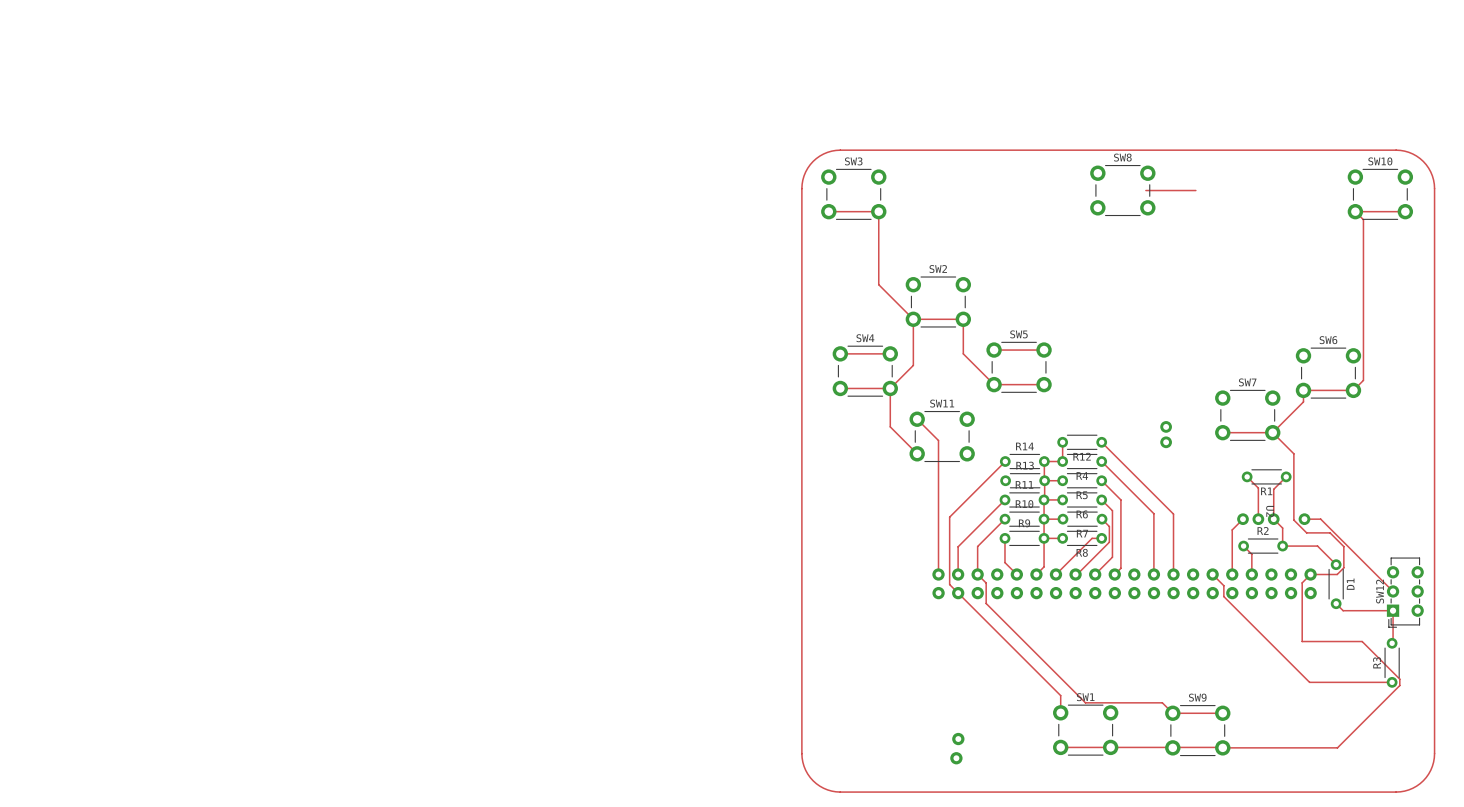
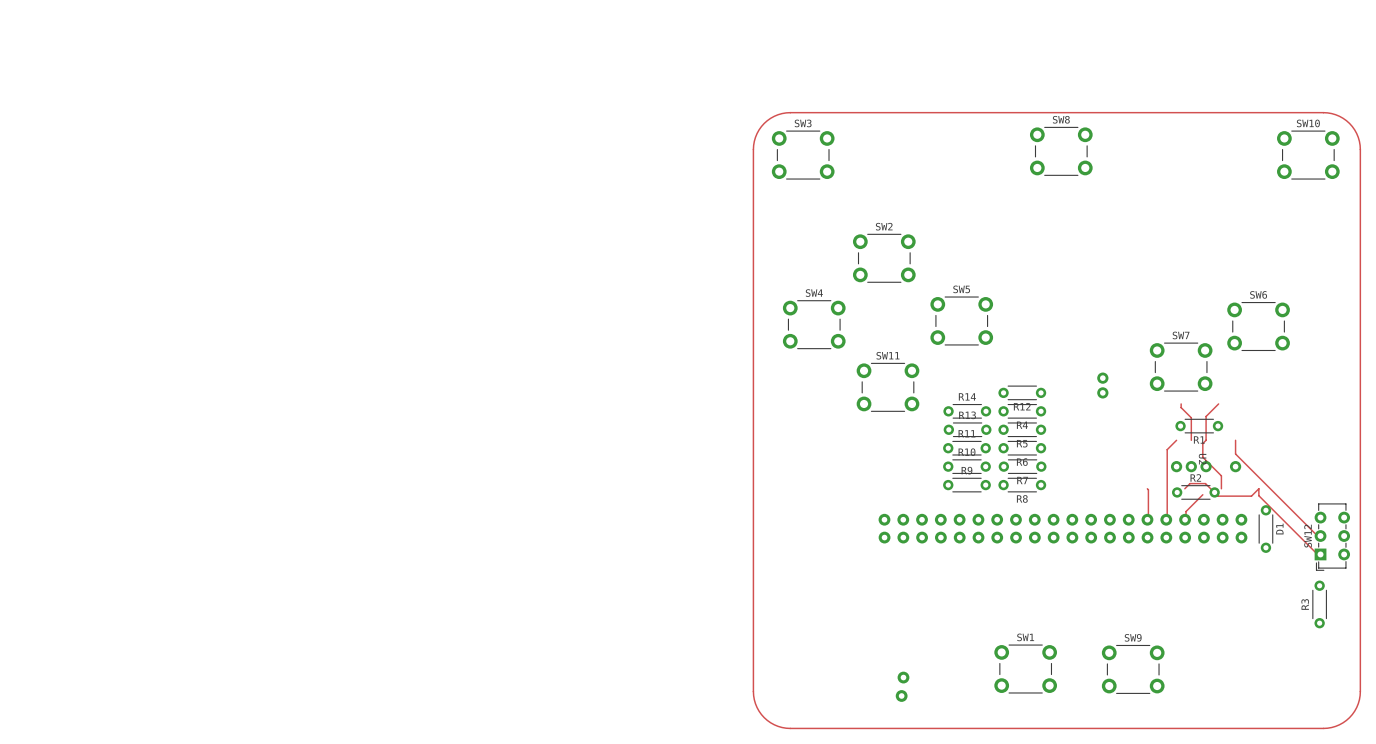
top track: (1145, 190) (1195, 190) -> none
top track: (828, 211) (878, 211) (878, 284) (913, 319) -> none
top track: (1405, 211) (1355, 211) (1363, 219) (1363, 380) (1353, 390) (1303, 390) (1303, 401) (1272, 432) -> none
top track: (913, 319) (913, 365) (890, 388) -> none
top track: (913, 319) (963, 319) (963, 353) (994, 384) (1044, 384) -> none
top track: (994, 350) (1044, 350) -> none
top track: (840, 353) (890, 353) -> none
top track: (840, 388) (890, 388) -> none
top track: (890, 388) (890, 426) (917, 453) -> none
top track: (917, 419) (938, 440) (938, 574) -> none
top track: (1222, 432) (1272, 432) -> none
top track: (1272, 432) (1293, 453) (1293, 520) (1306, 532) (1330, 532) (1343, 546) (1343, 567) (1337, 574) (1310, 574) (1302, 582) (1302, 641) (1362, 641) (1399, 679) (1399, 685) (1337, 747) (1060, 747) -> none
top track: (1062, 442) (1062, 461) (1044, 461) (1044, 480) -> none
top track: (1101, 442) (1173, 514) (1173, 574) -> none
top track: (1005, 461) (949, 517) (949, 584) (1060, 695) (1060, 712) -> none
top track: (1101, 461) (1153, 513) (1153, 574) -> none
top track: (1247, 476) (1258, 488) -> (1181, 403) (1181, 407) (1191, 417) (1191, 436)
top track: (1286, 476) (1273, 489) -> (1218, 403) (1206, 416) (1206, 438)
top track: (1044, 480) (1044, 499) -> none
top track: (1044, 480) (1062, 480) -> none
top track: (1101, 480) (1120, 499) (1120, 568) (1114, 574) -> none
top track: none -> (1176, 440) (1167, 449) (1167, 522)
top track: (1258, 491) (1258, 519) -> none
top track: (1273, 491) (1273, 519) (1282, 528) (1282, 546) (1317, 546) (1336, 564) -> (1206, 440) (1202, 443) (1202, 457) (1221, 475) (1221, 488)
top track: none -> (1235, 440) (1235, 454) (1321, 539)
top track: (1004, 499) (958, 546) (958, 574) -> none
top track: (1044, 499) (1044, 566) (1036, 574) -> none
top track: (1044, 499) (1062, 499) -> none
top track: (1101, 499) (1112, 510) (1112, 557) (1095, 574) -> none
top track: (1004, 519) (977, 546) (977, 574) (986, 583) (986, 603) (1085, 702) (1162, 702) (1172, 713) (1222, 713) -> none
top track: (1044, 519) (1062, 519) -> none
top track: (1102, 519) (1109, 526) (1109, 542) (1075, 574) -> none
top track: (1242, 519) (1232, 529) (1232, 574) -> none
top track: (1304, 519) (1320, 519) (1393, 591) -> none
top track: (1004, 538) (1004, 562) (1016, 574) -> none
top track: (1044, 538) (1062, 538) -> none
top track: (1101, 538) (1092, 538) (1055, 574) -> none
top track: none -> (1147, 488) (1148, 522)
top track: none -> (1184, 488) (1189, 483) (1205, 483) (1218, 496) (1251, 496) (1258, 488) (1258, 495) (1321, 558)
top track: (1243, 546) (1251, 554) (1251, 574) -> none
top track: none -> (1202, 494) (1186, 511) (1186, 522)
top track: (1212, 574) (1223, 585) (1223, 596) (1309, 682) (1392, 682) -> none
top track: (1336, 603) (1343, 610) (1393, 610) (1392, 643) -> none

